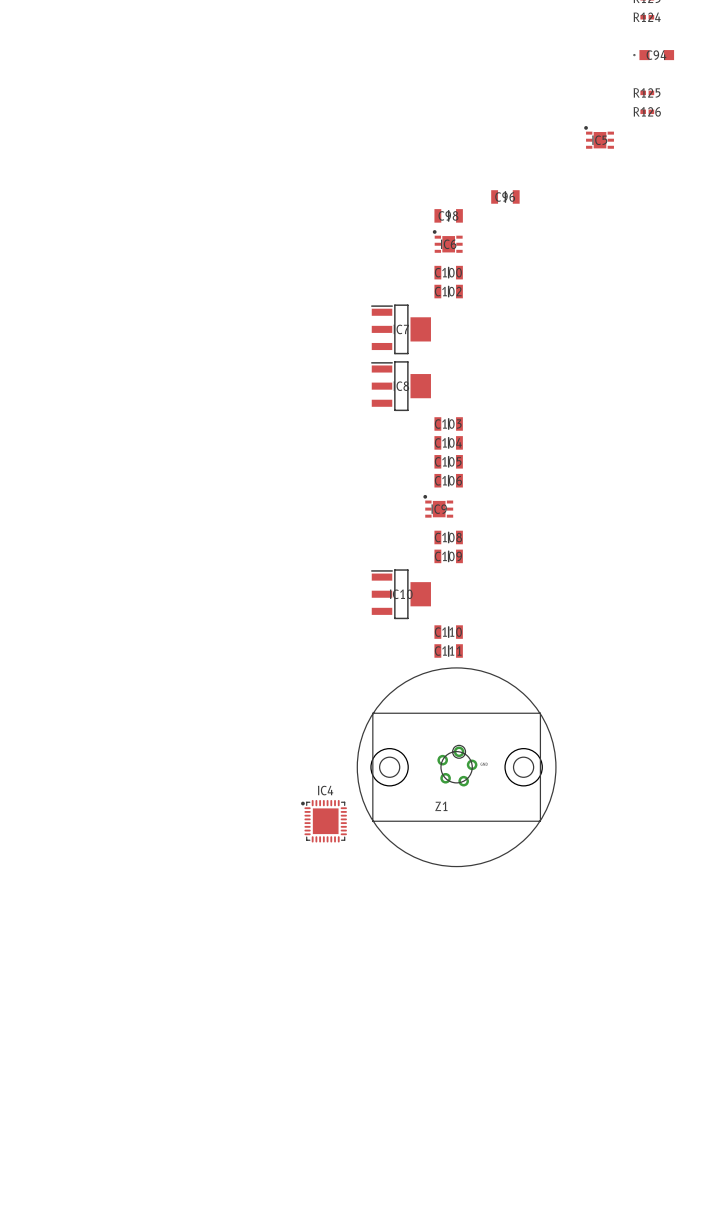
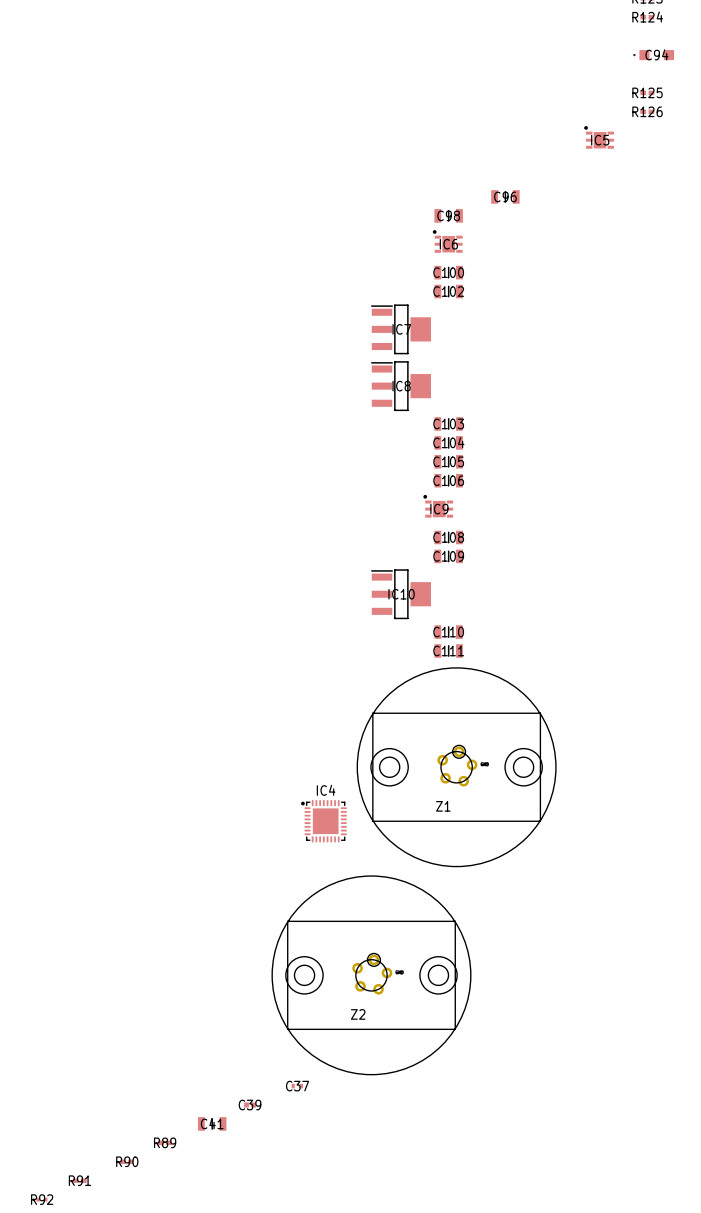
Z2: none -> (371, 975)
C37: none -> (297, 1086)
C39: none -> (250, 1105)
C41: none -> (212, 1123)
R89: none -> (164, 1142)
R90: none -> (127, 1161)
R91: none -> (79, 1180)
R92: none -> (40, 1199)

